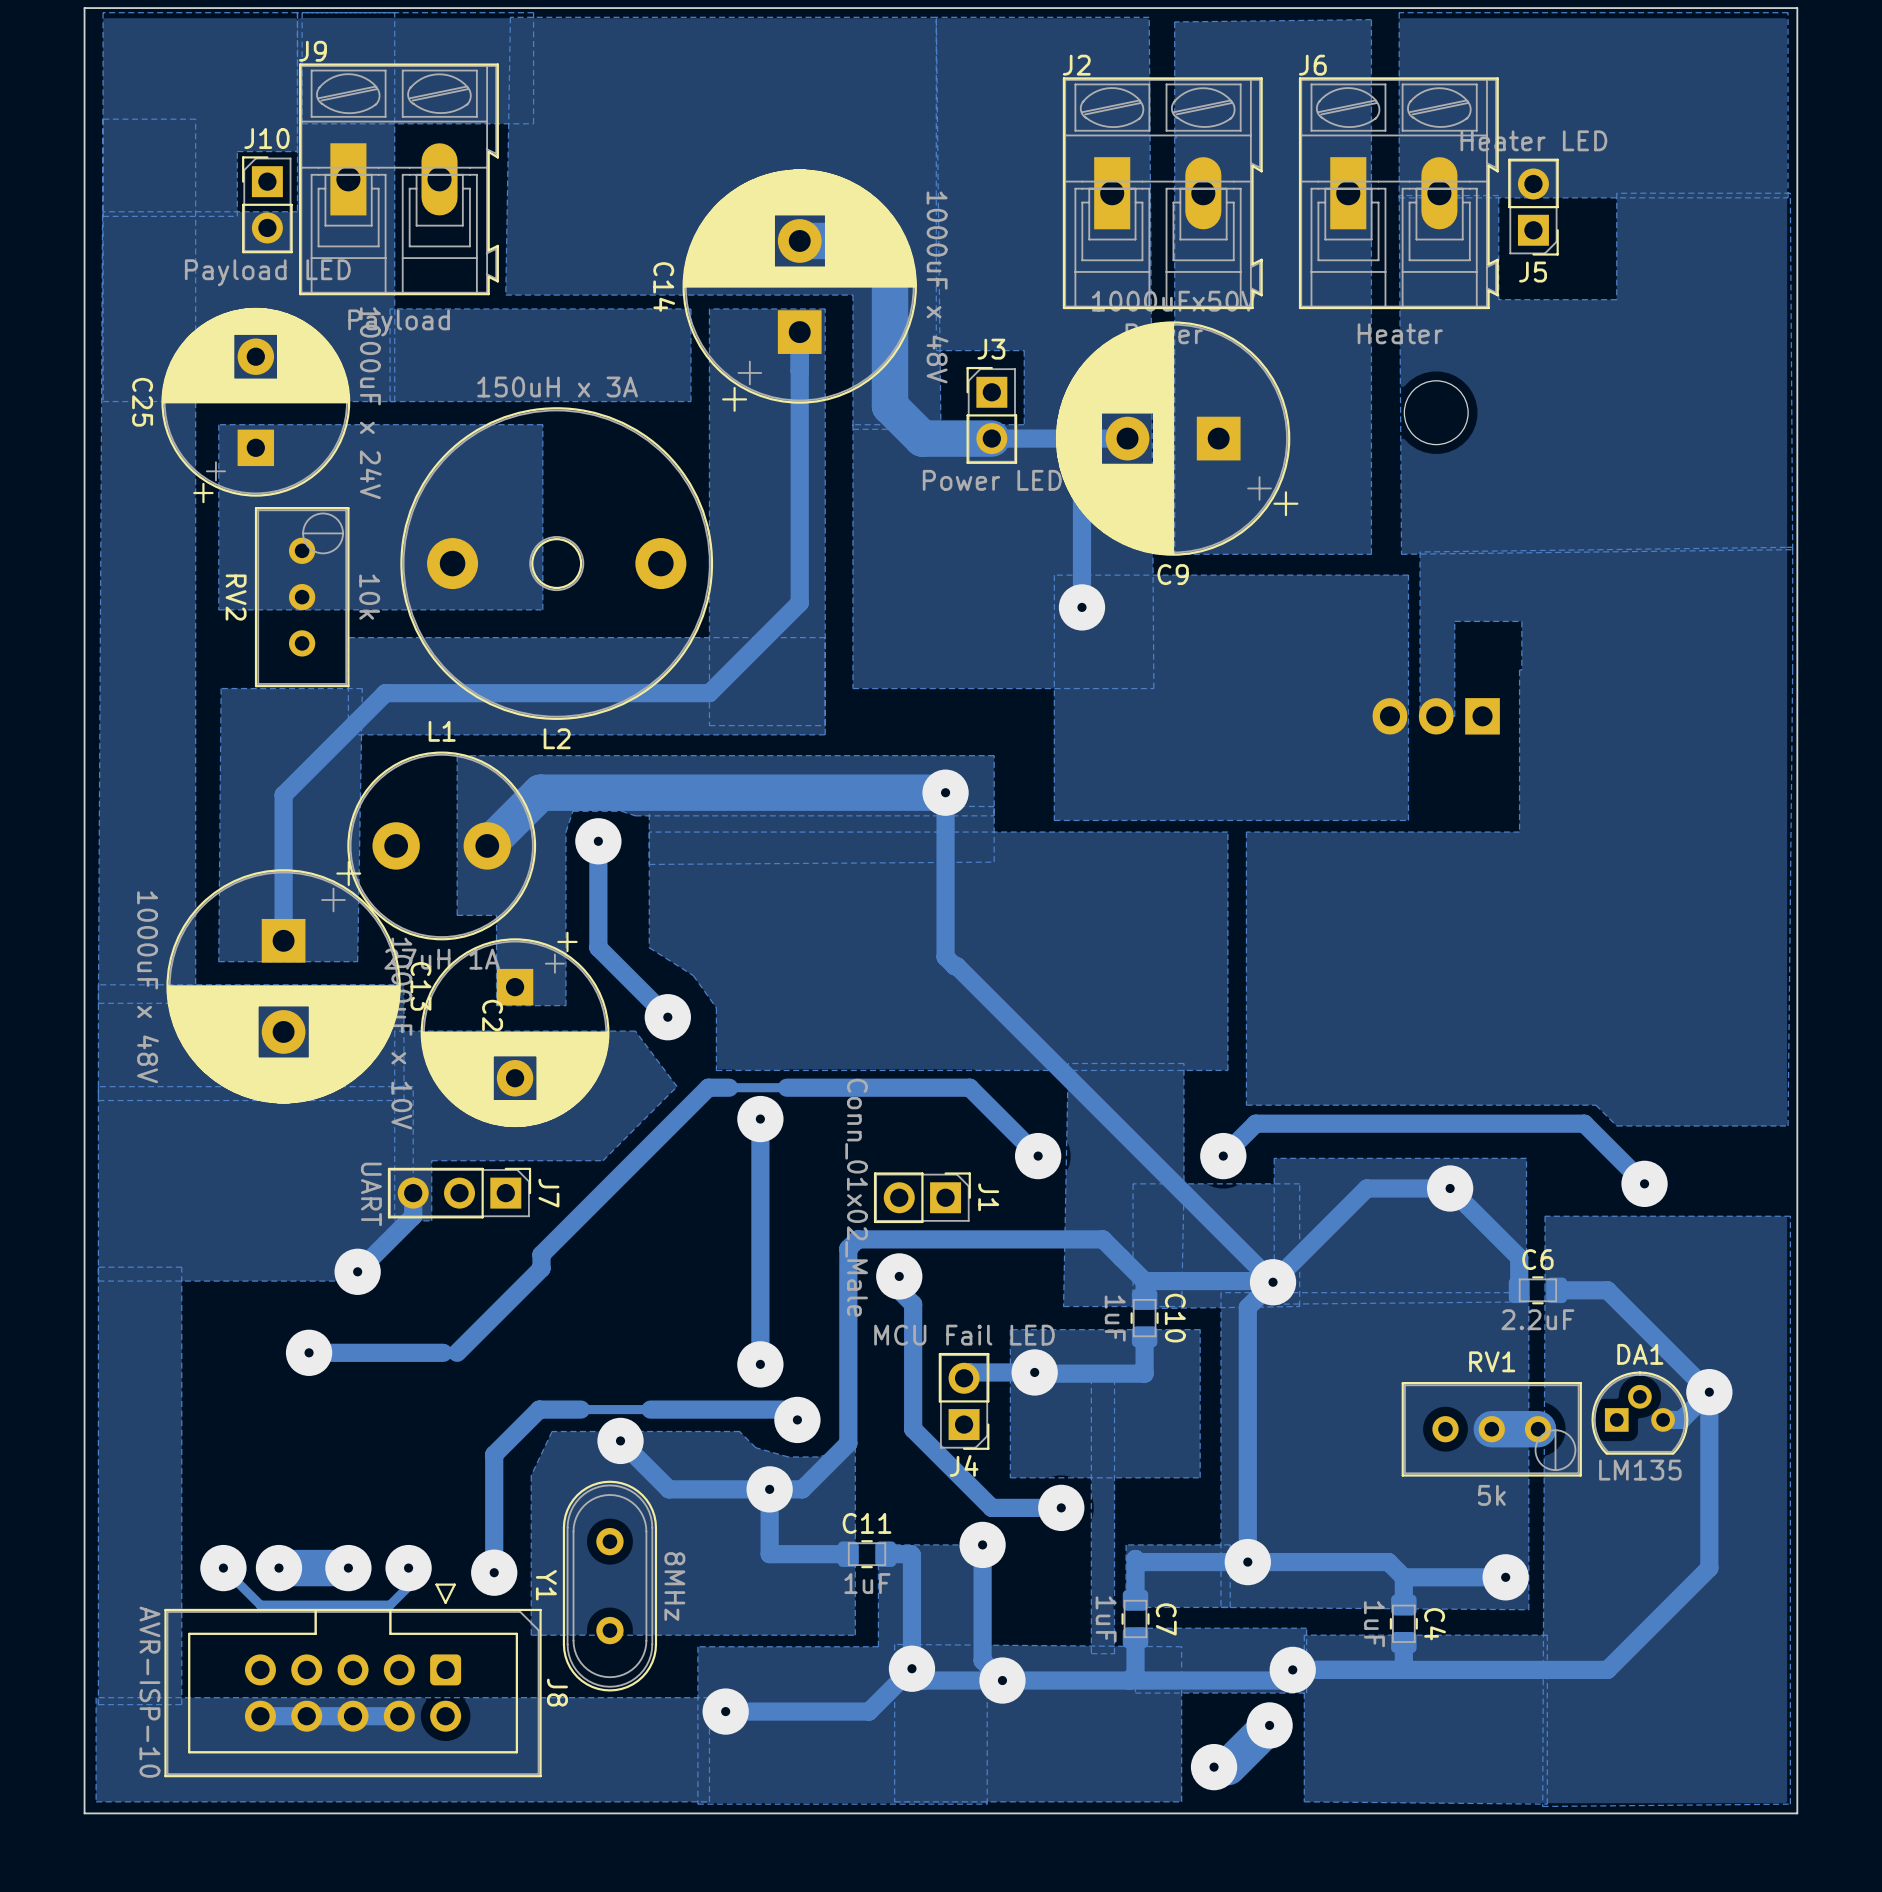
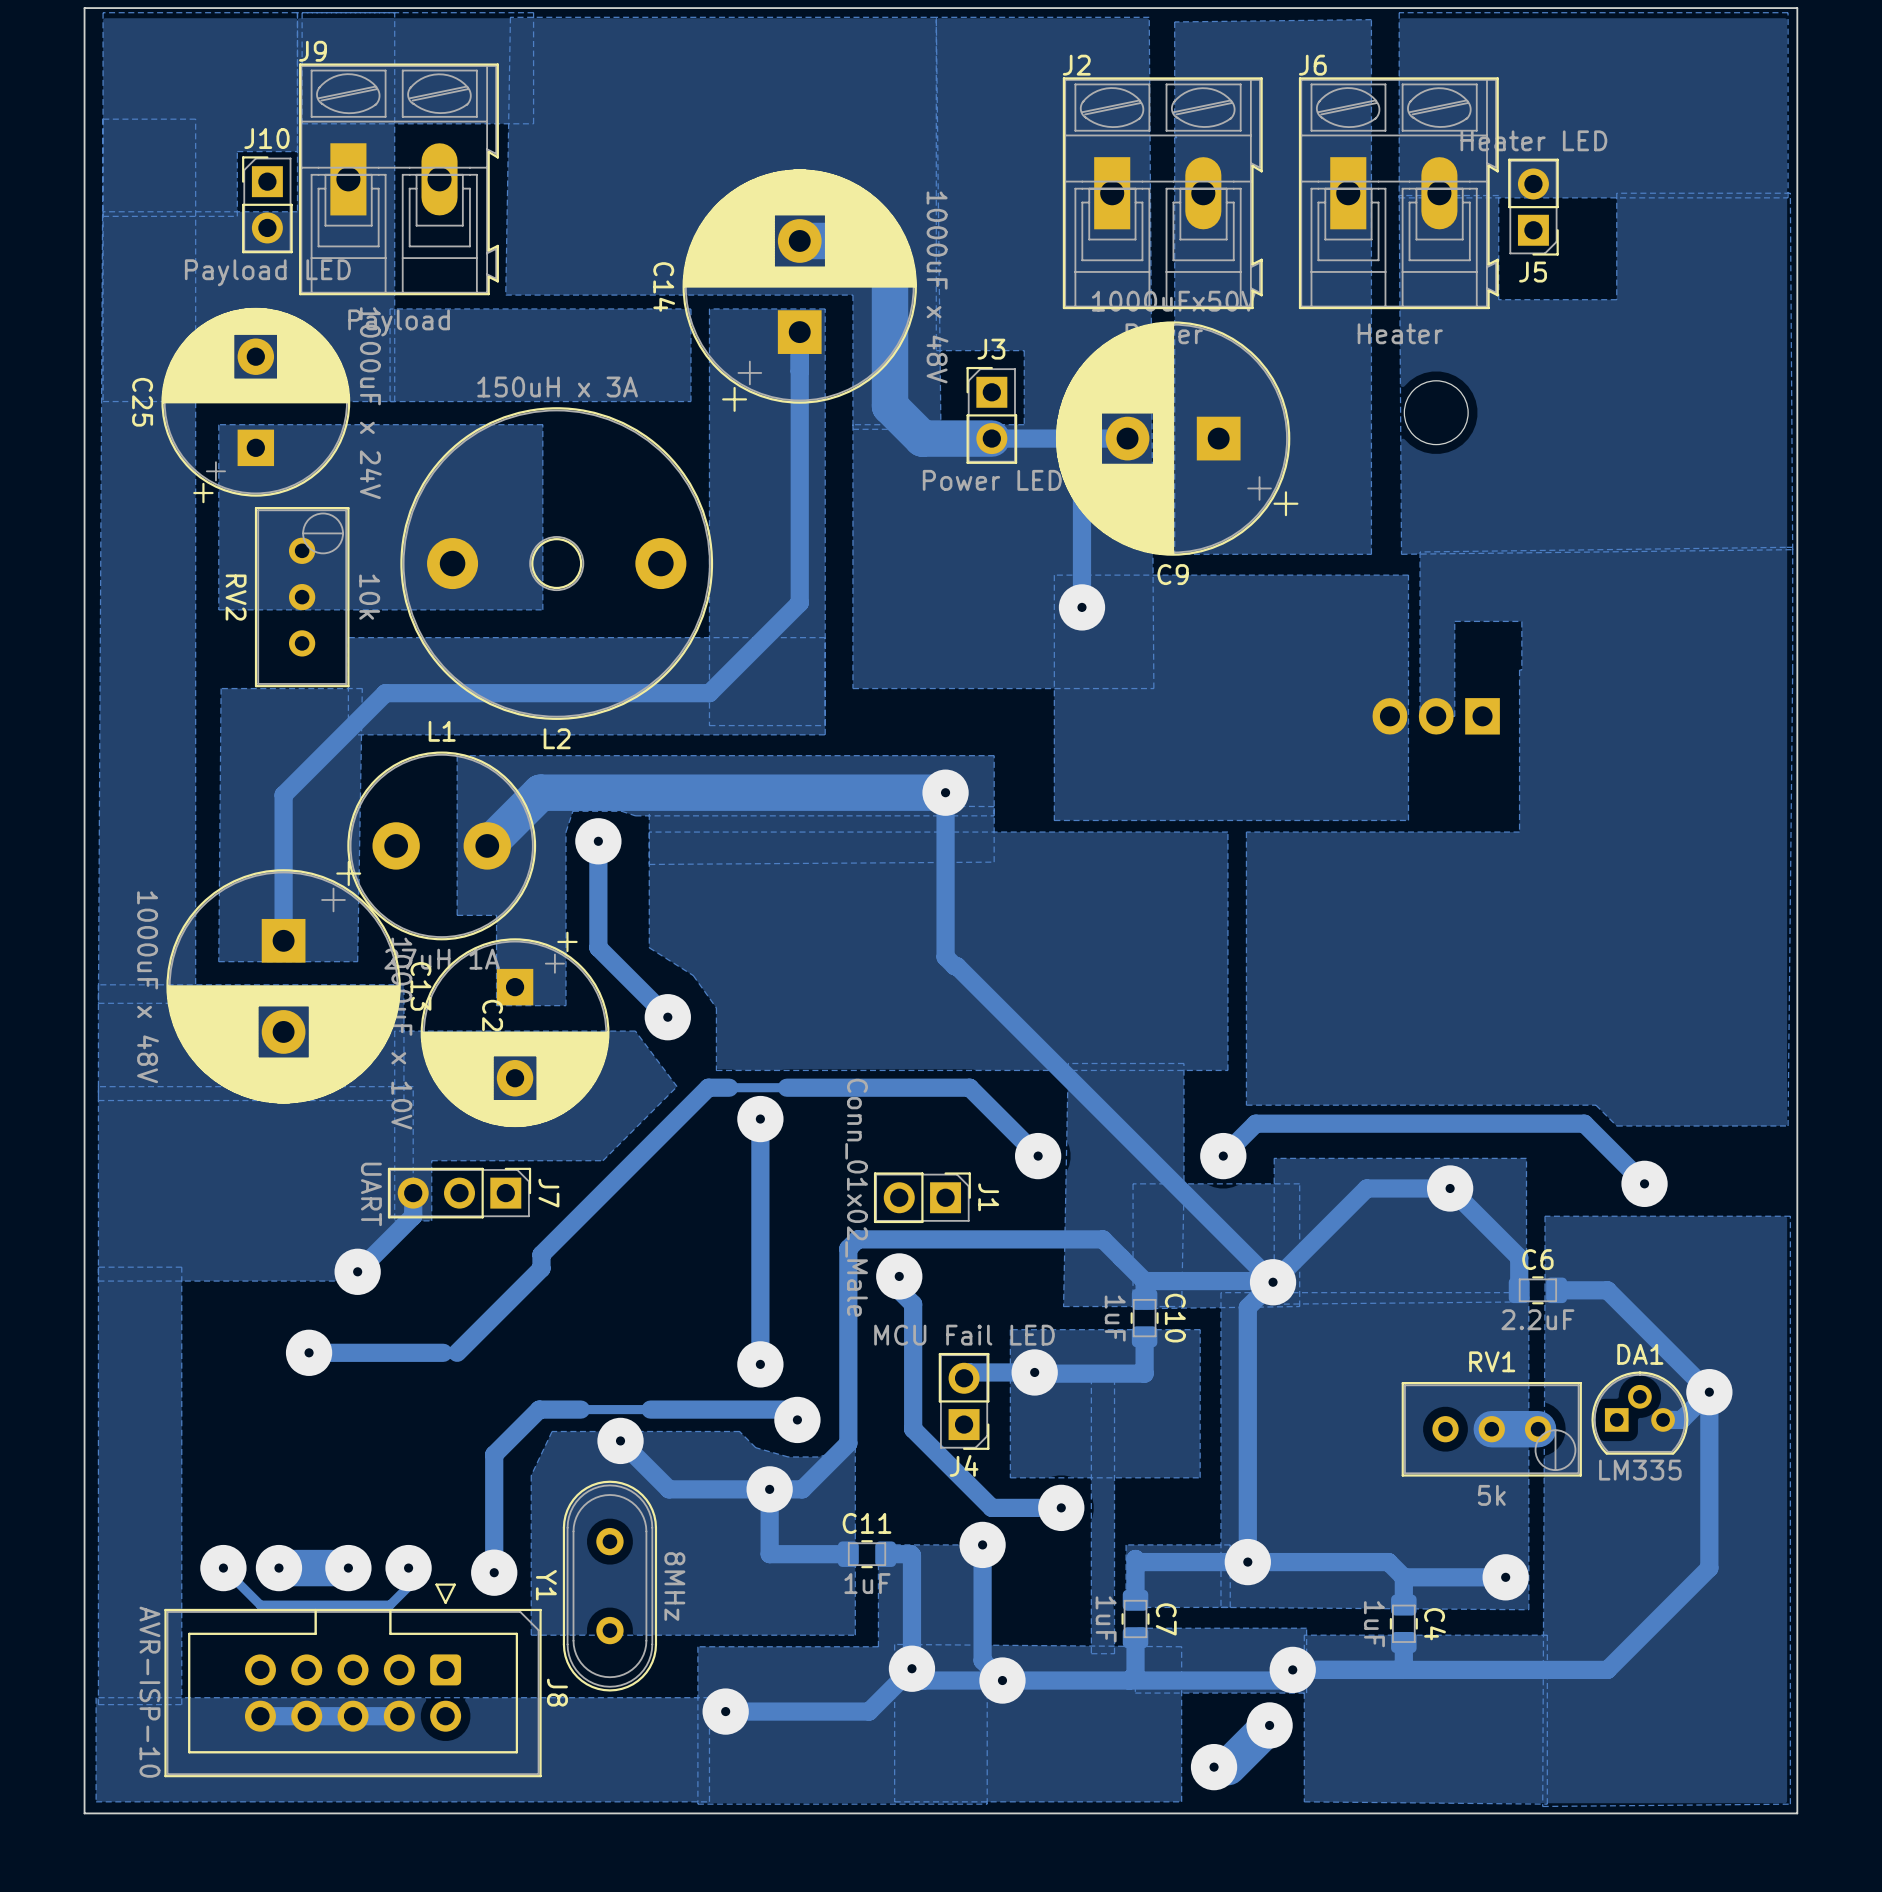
DA1 value: LM135 (1640, 1470) -> LM335 (1640, 1470)

